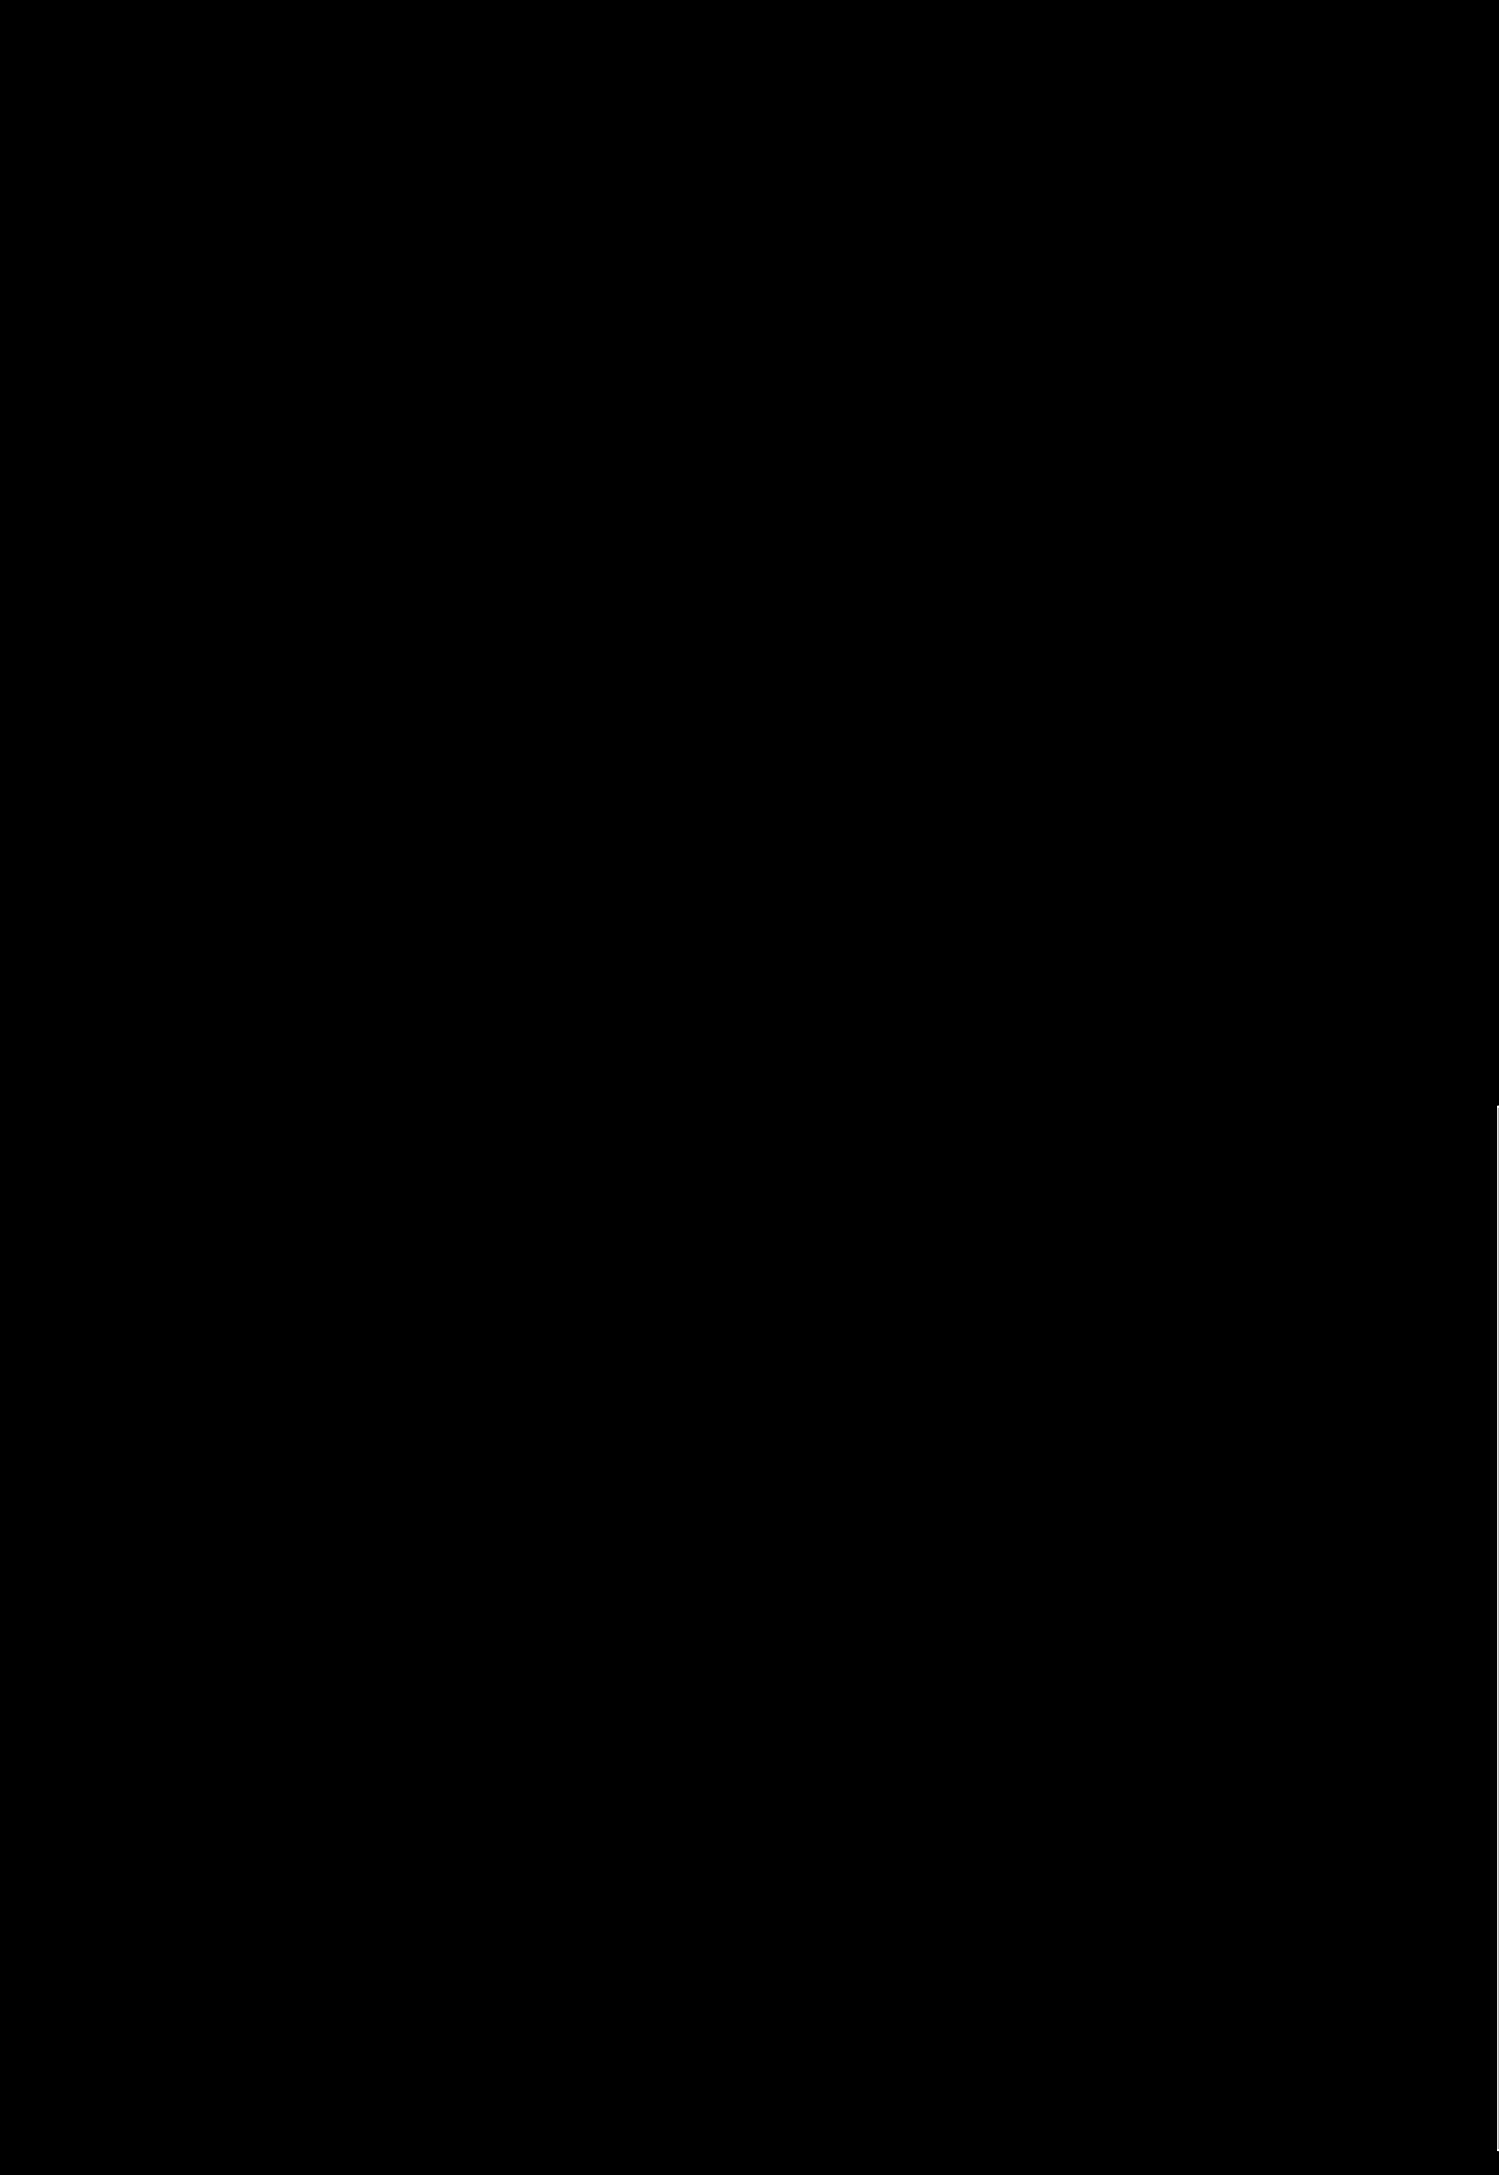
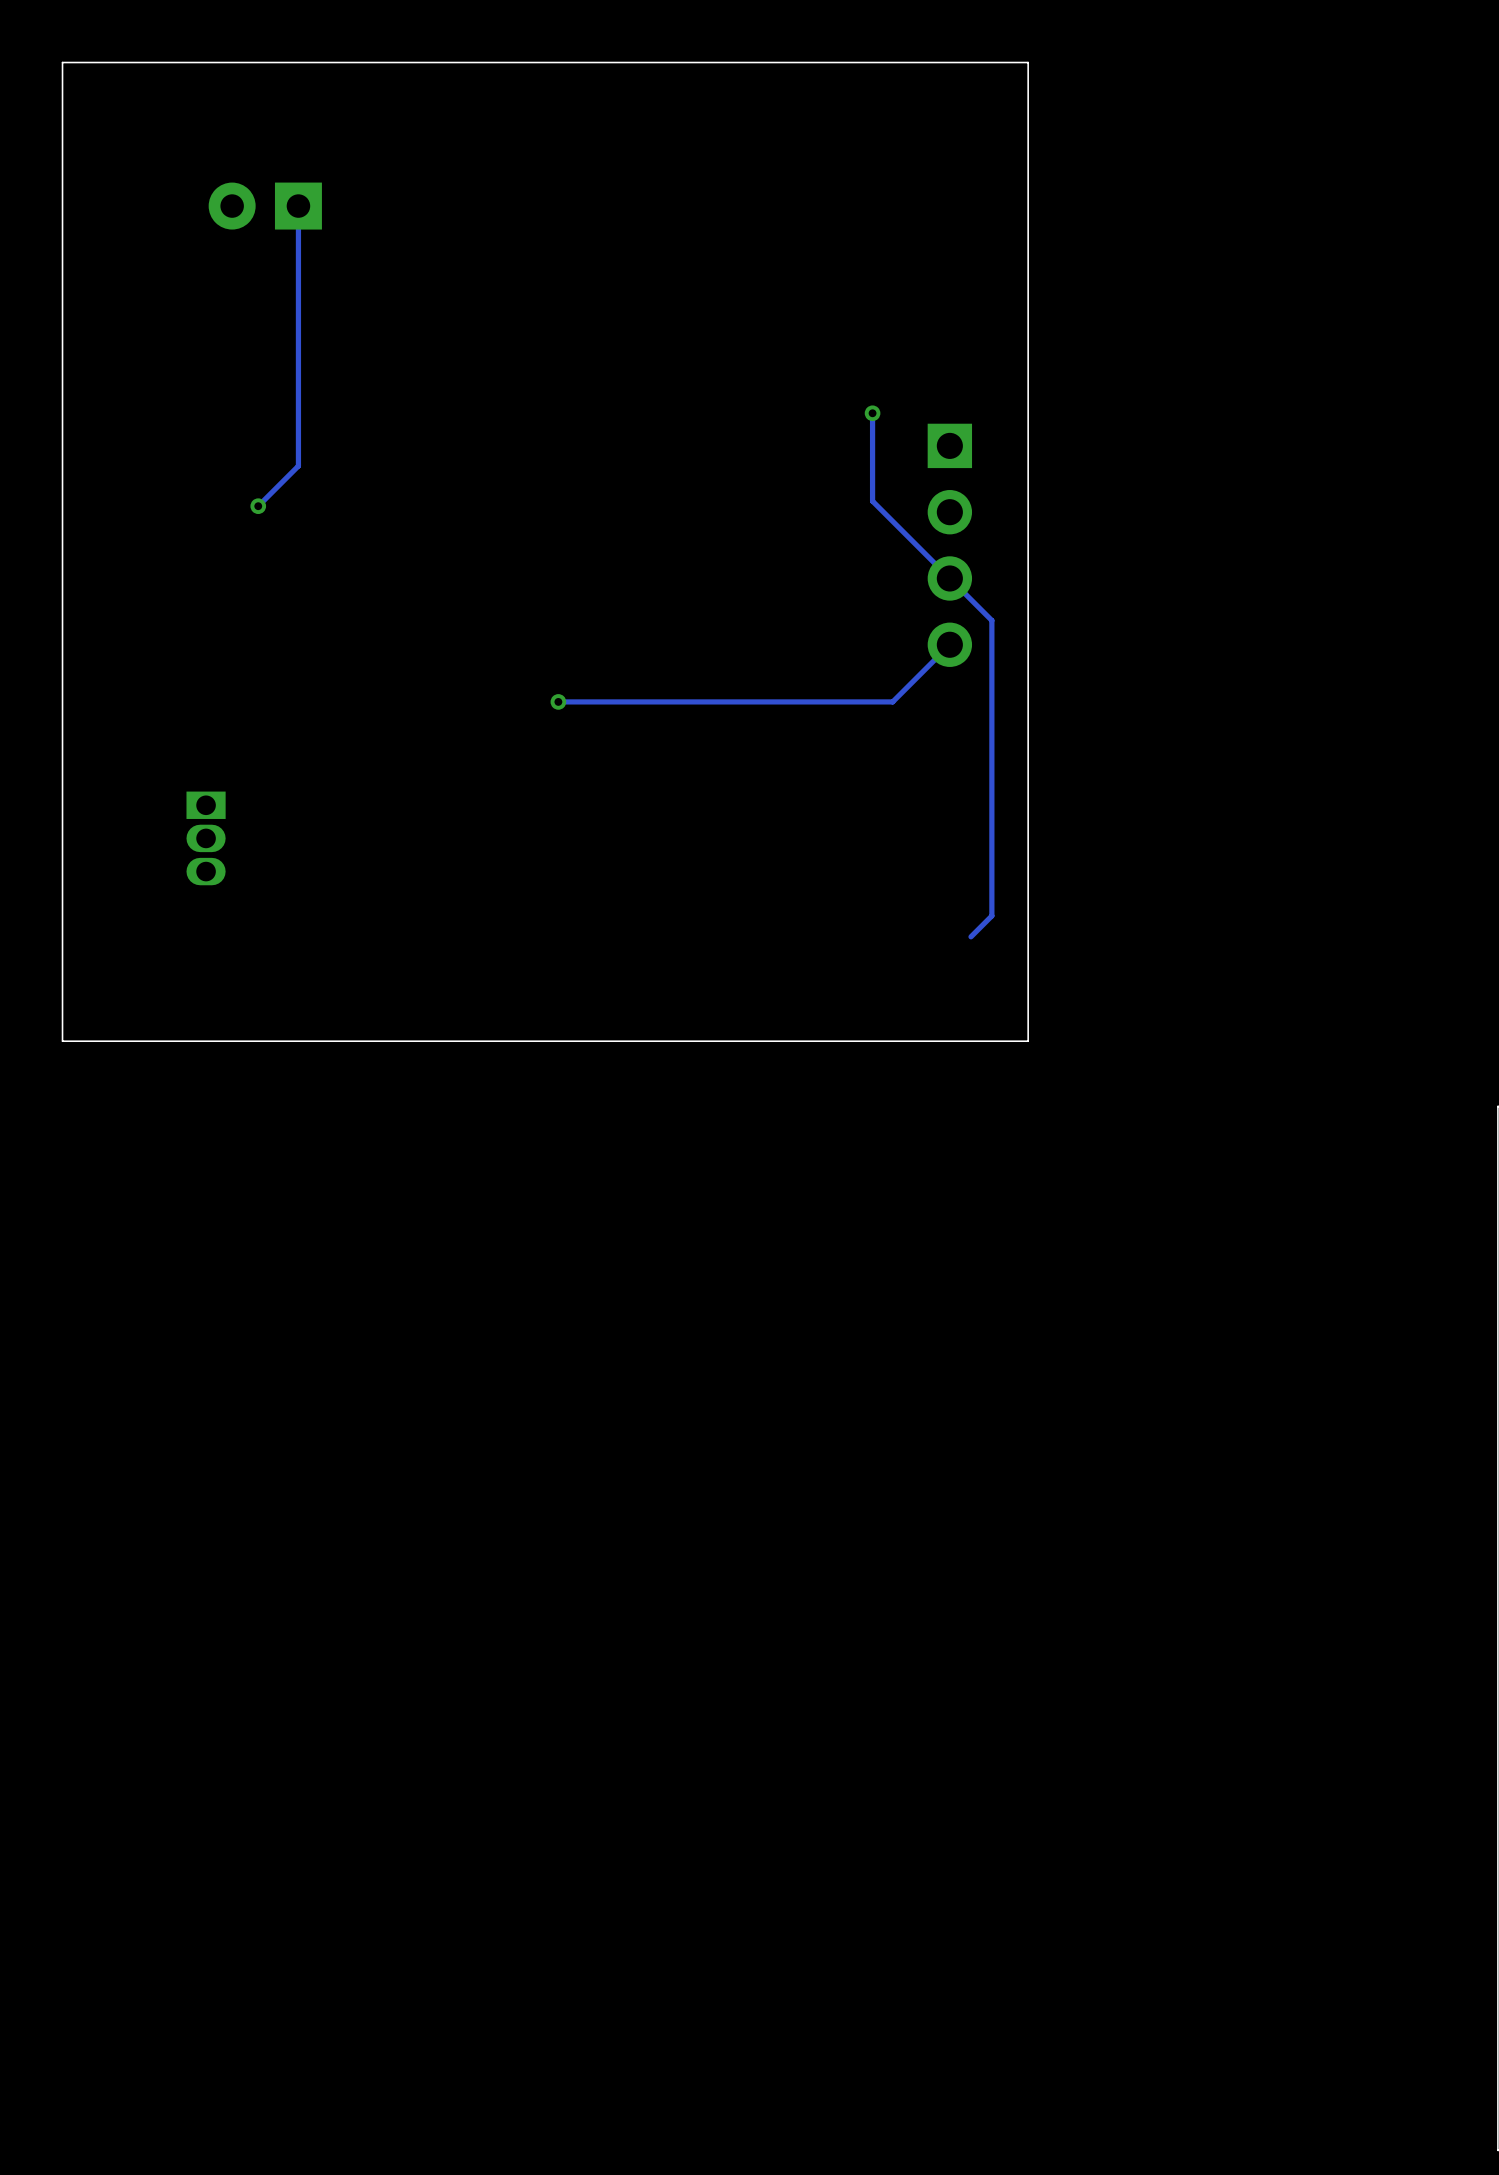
board edge: none -> (1028, 62) (62, 62) (62, 1041) (1028, 1041) (1028, 62)
part: none -> (265, 206)
track: none -> (298, 206) (298, 465) (258, 506)
track: none -> (872, 413) (872, 501) (991, 620) (991, 915) (970, 936)
via: none -> (872, 413)
via: none -> (258, 506)
part: none -> (949, 545)
track: none -> (949, 644) (892, 701) (558, 701)
via: none -> (558, 701)
part: none -> (206, 838)

